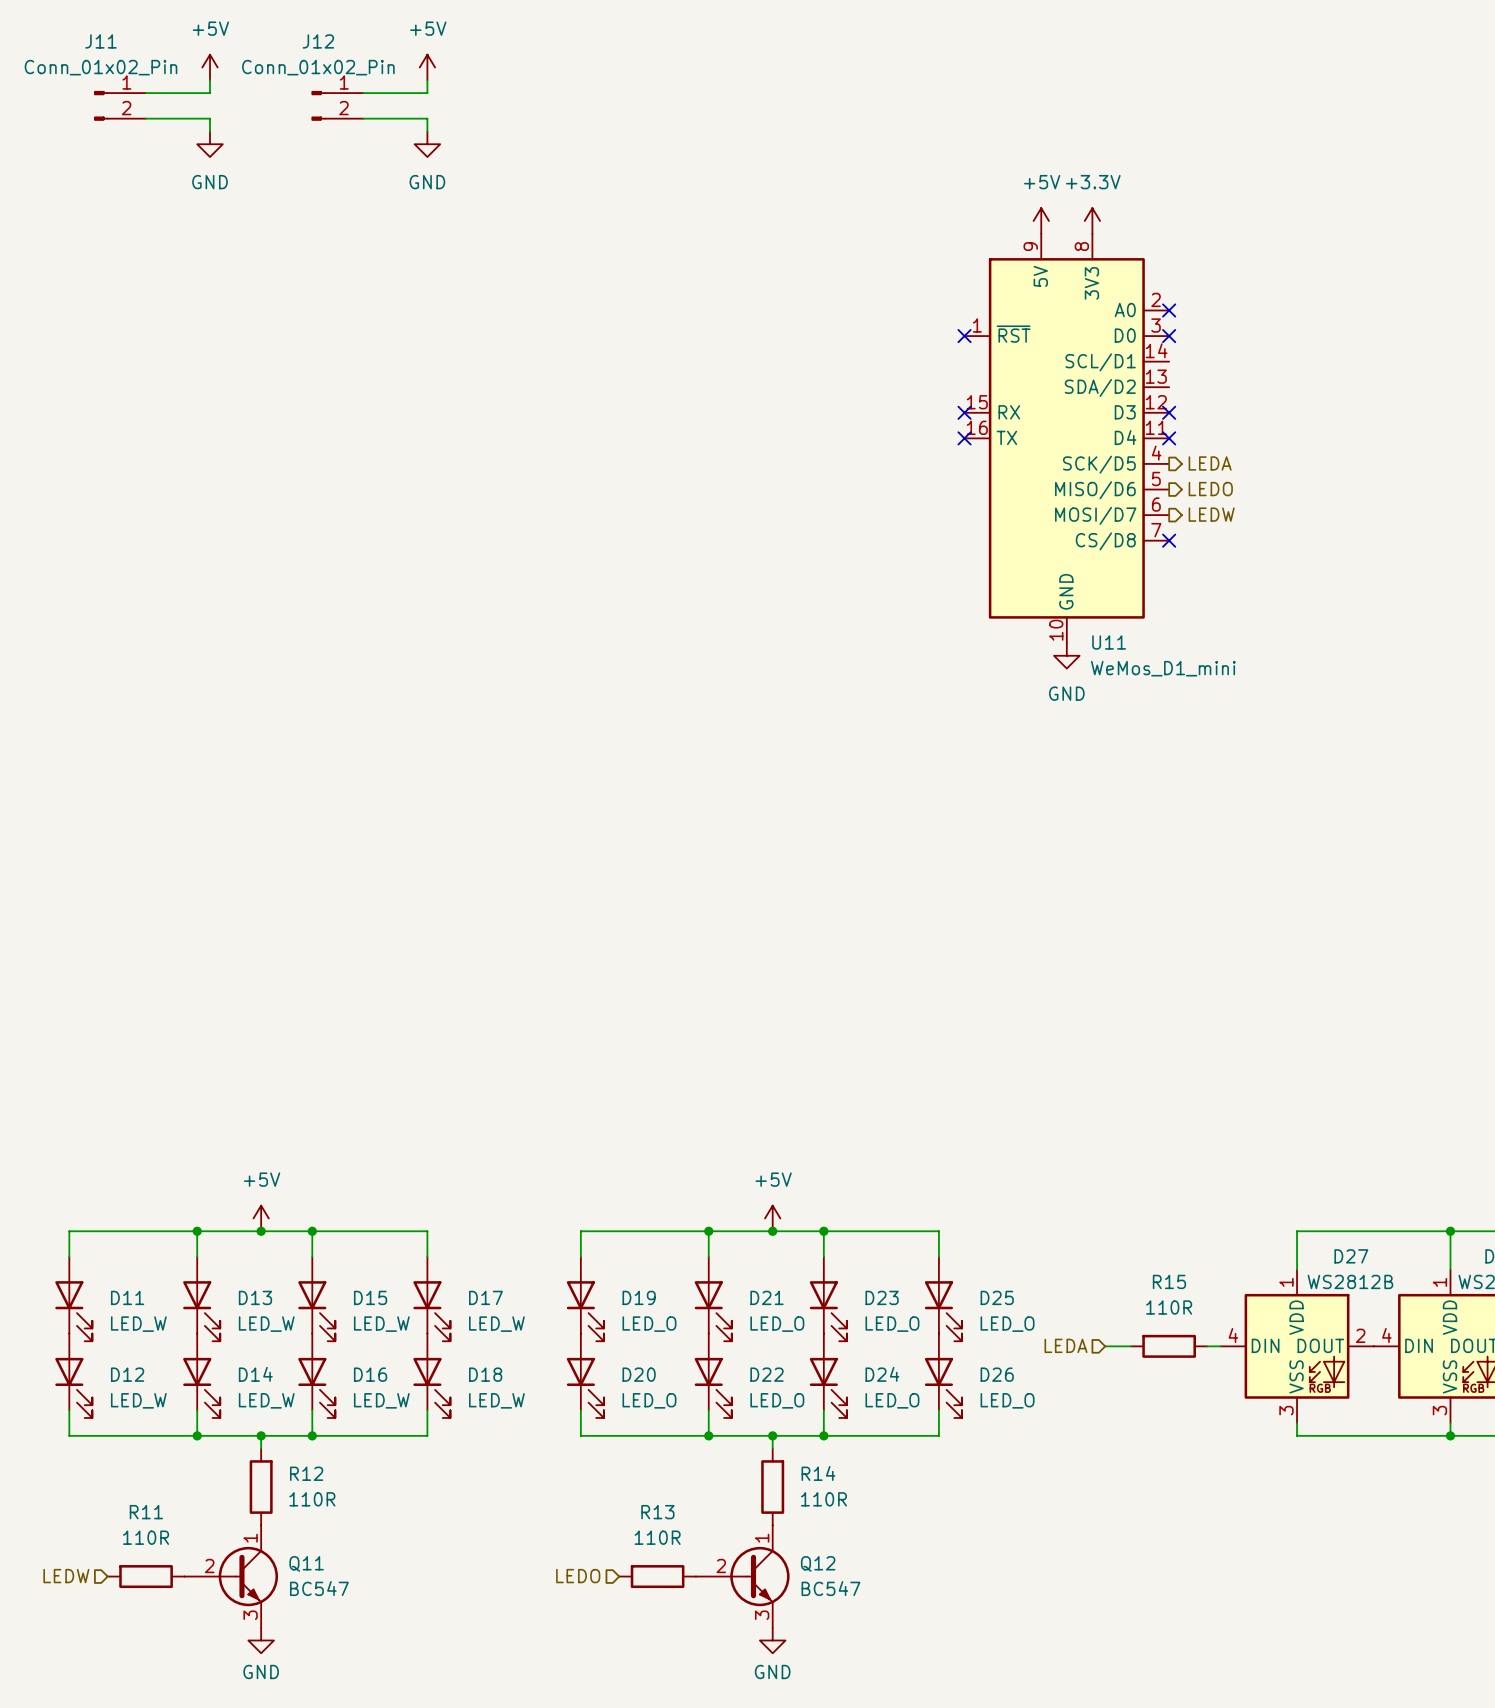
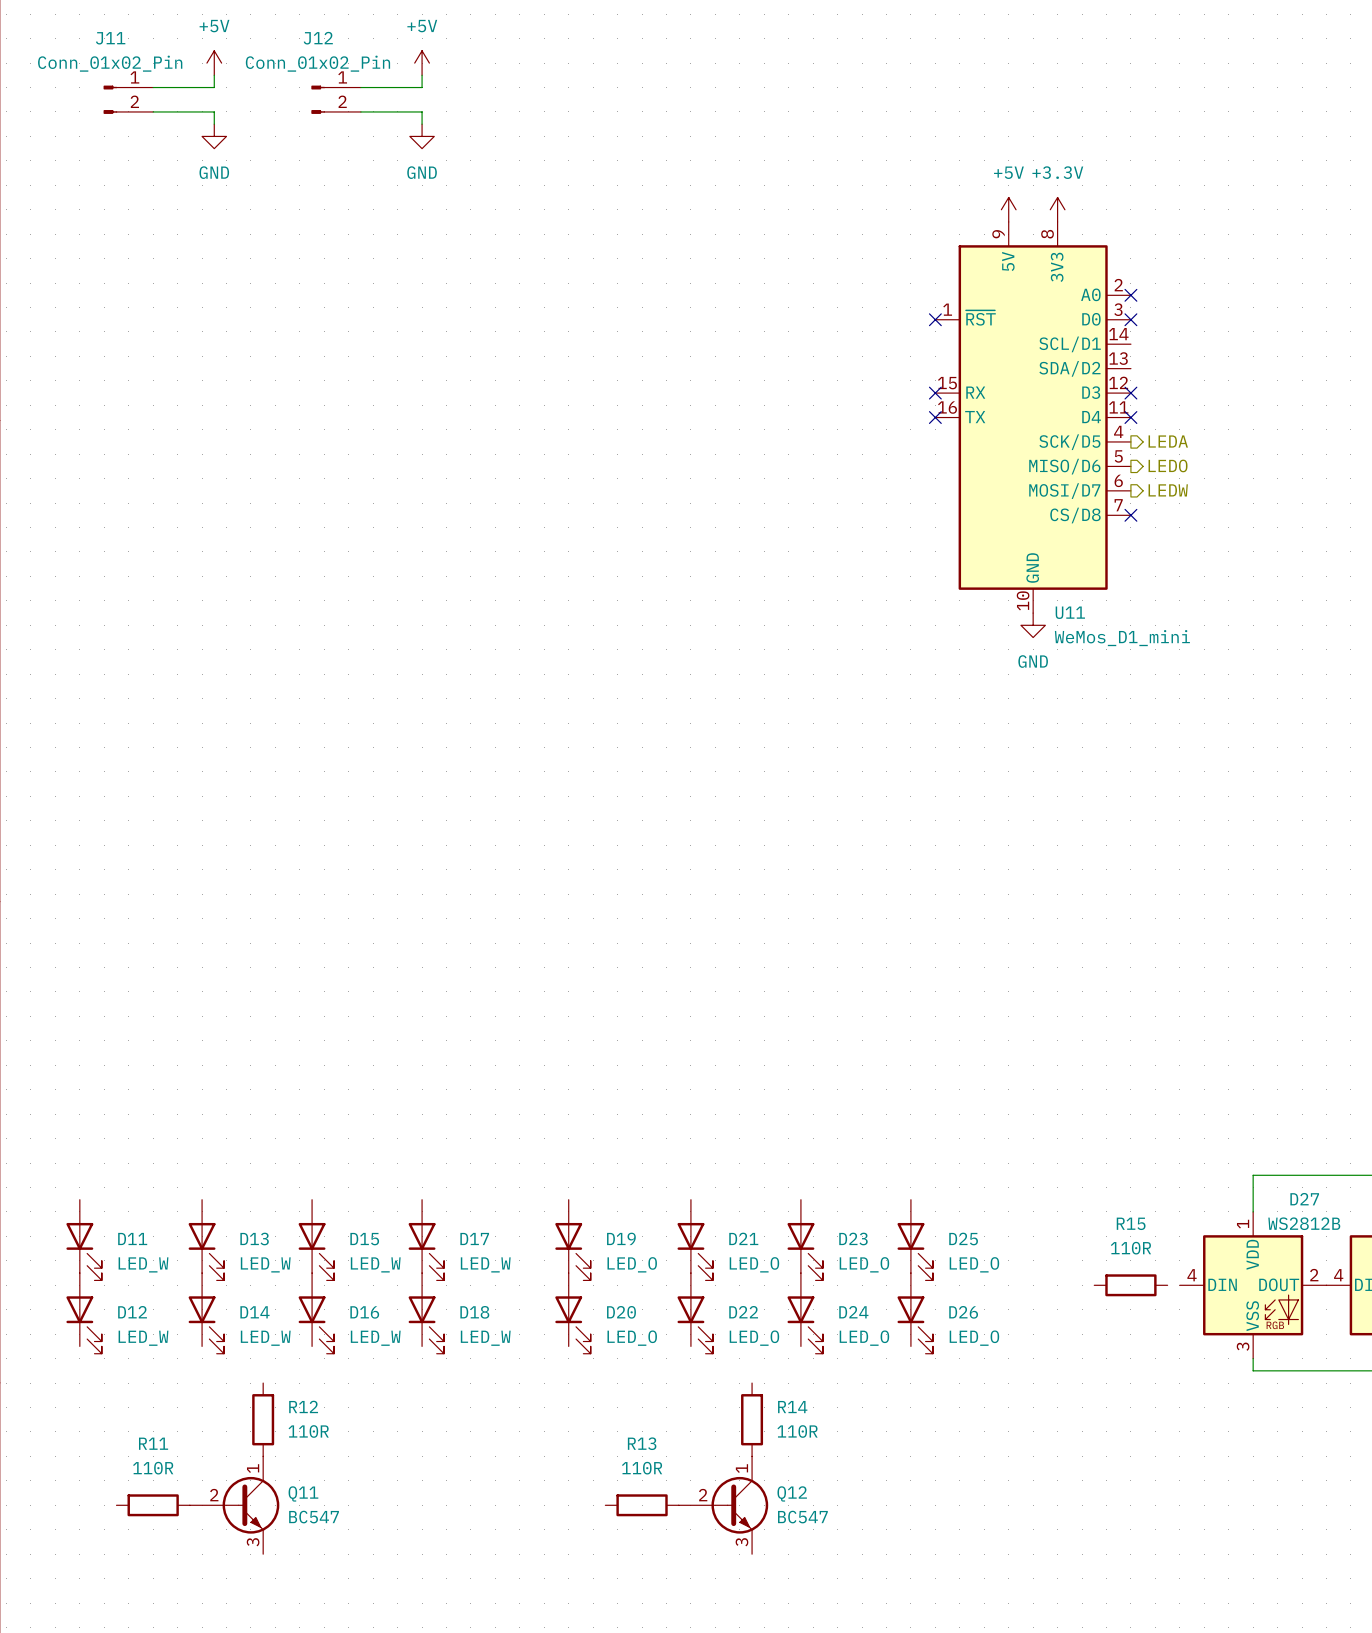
power symbol: +5V (261, 1218) -> none
power symbol: +5V (772, 1218) -> none
wire: (197, 1231) (197, 1256) -> none
junction: (197, 1231) -> none
junction: (261, 1231) -> none
wire: (312, 1231) (312, 1256) -> none
junction: (312, 1231) -> none
wire: (708, 1231) (708, 1256) -> none
junction: (708, 1231) -> none
junction: (772, 1231) -> none
wire: (823, 1231) (823, 1256) -> none
junction: (823, 1231) -> none
wire: (69, 1256) (69, 1231) (427, 1231) (427, 1256) -> none
wire: (580, 1256) (580, 1231) (938, 1231) (938, 1256) -> none
hierarchical label: LEDA (1066, 1345) -> none
wire: (1105, 1346) (1130, 1346) -> none
wire: (1207, 1346) (1220, 1346) -> none
wire: (69, 1410) (69, 1435) (427, 1435) (427, 1410) -> none
wire: (197, 1410) (197, 1435) -> none
wire: (312, 1410) (312, 1435) -> none
wire: (580, 1410) (580, 1435) (938, 1435) (938, 1410) -> none
wire: (708, 1410) (708, 1435) -> none
wire: (823, 1410) (823, 1435) -> none
junction: (197, 1435) -> none
wire: (261, 1435) (261, 1448) -> none
junction: (261, 1435) -> none
junction: (312, 1435) -> none
junction: (708, 1435) -> none
wire: (772, 1435) (772, 1448) -> none
junction: (772, 1435) -> none
junction: (823, 1435) -> none
hierarchical label: LEDW (66, 1576) -> none
hierarchical label: LEDO (578, 1576) -> none
power symbol: GND (261, 1640) -> none
power symbol: GND (772, 1640) -> none

